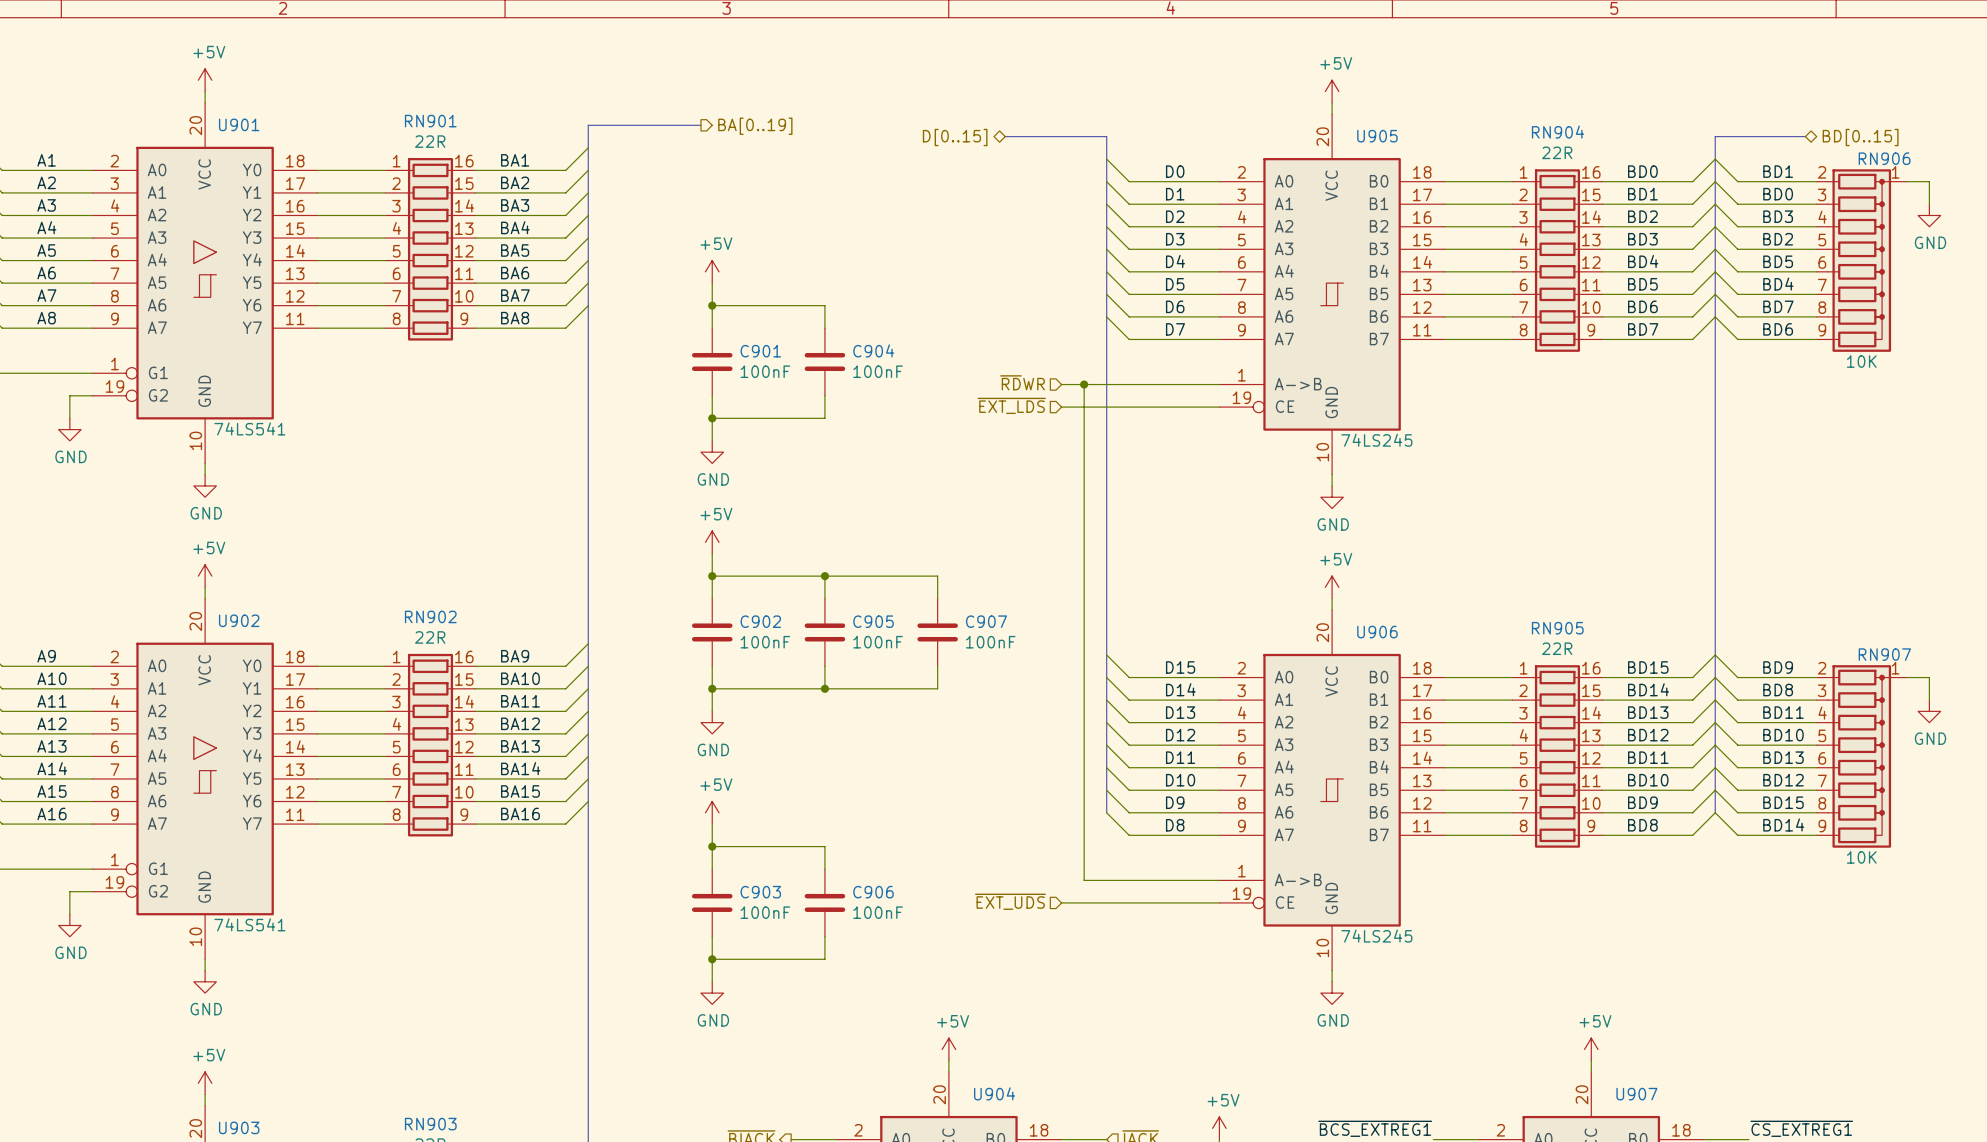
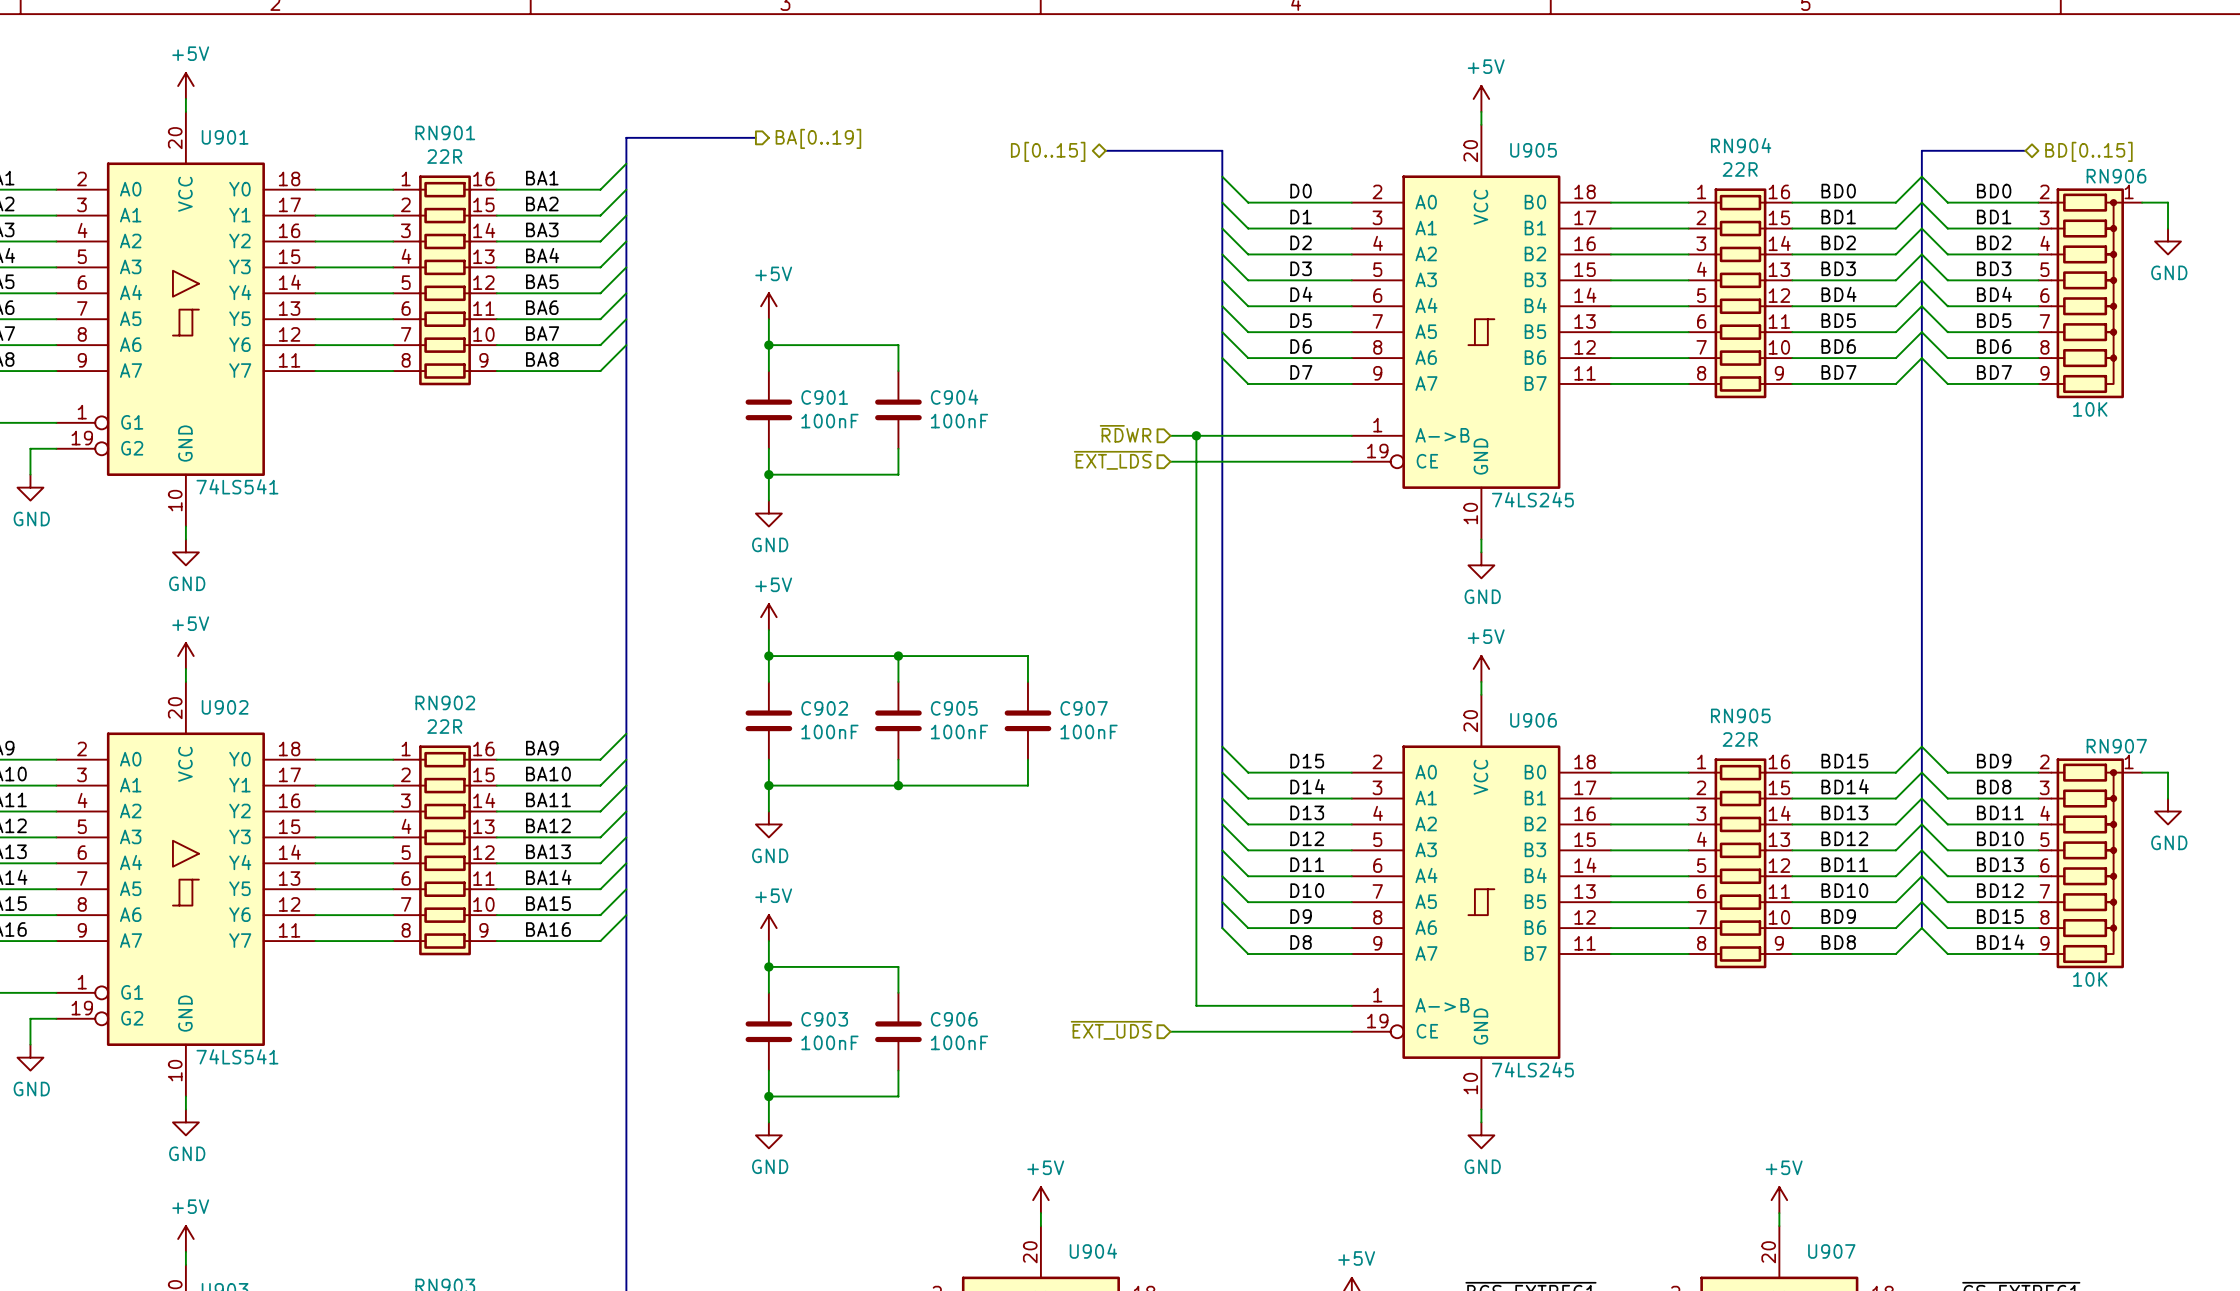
label: BD1 (1778, 171) -> BD0 (1994, 191)
label: BD0 (1778, 194) -> BD1 (1994, 216)
label: BD3 (1778, 216) -> BD2 (1994, 242)
label: BD2 (1778, 239) -> BD3 (1994, 268)
label: BD5 (1778, 261) -> BD4 (1994, 294)
label: BD4 (1778, 284) -> BD5 (1994, 320)
label: BD7 (1778, 306) -> BD6 (1994, 346)
label: BD6 (1778, 329) -> BD7 (1994, 372)

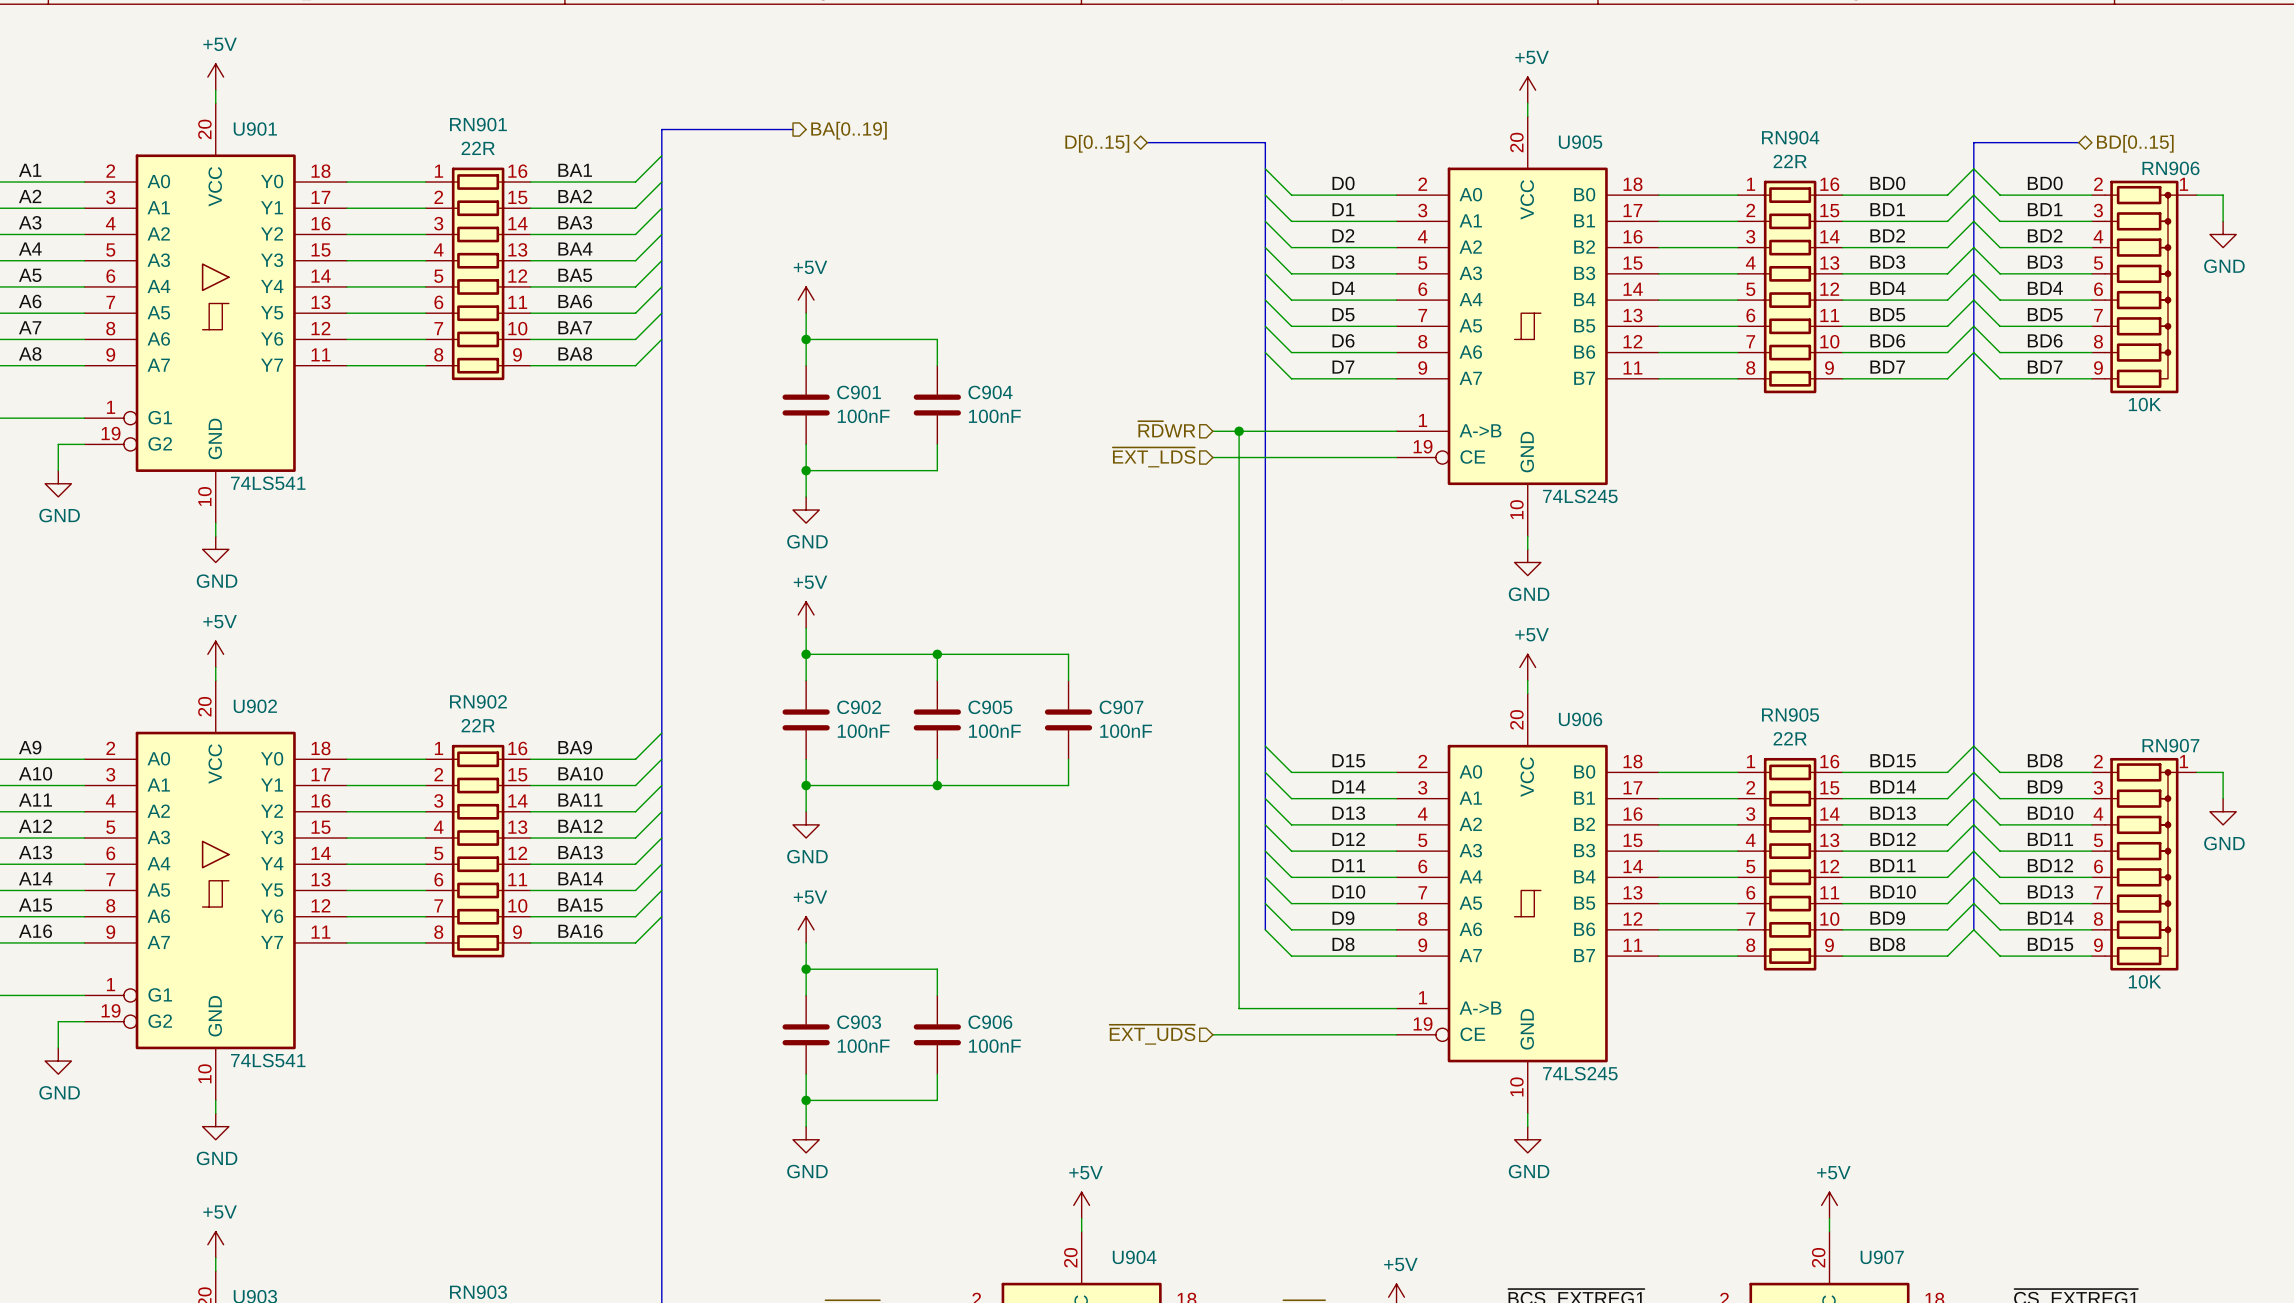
label: BD9 (1994, 761) -> BD8 (2045, 760)
label: BD8 (1994, 786) -> BD9 (2045, 786)
label: BD11 (2000, 812) -> BD10 (2050, 813)
label: BD10 (2000, 838) -> BD11 (2050, 839)
label: BD13 (2000, 864) -> BD12 (2050, 865)
label: BD12 (2000, 890) -> BD13 (2050, 891)
label: BD15 (2000, 916) -> BD14 (2050, 918)
label: BD14 (2000, 942) -> BD15 (2050, 944)

